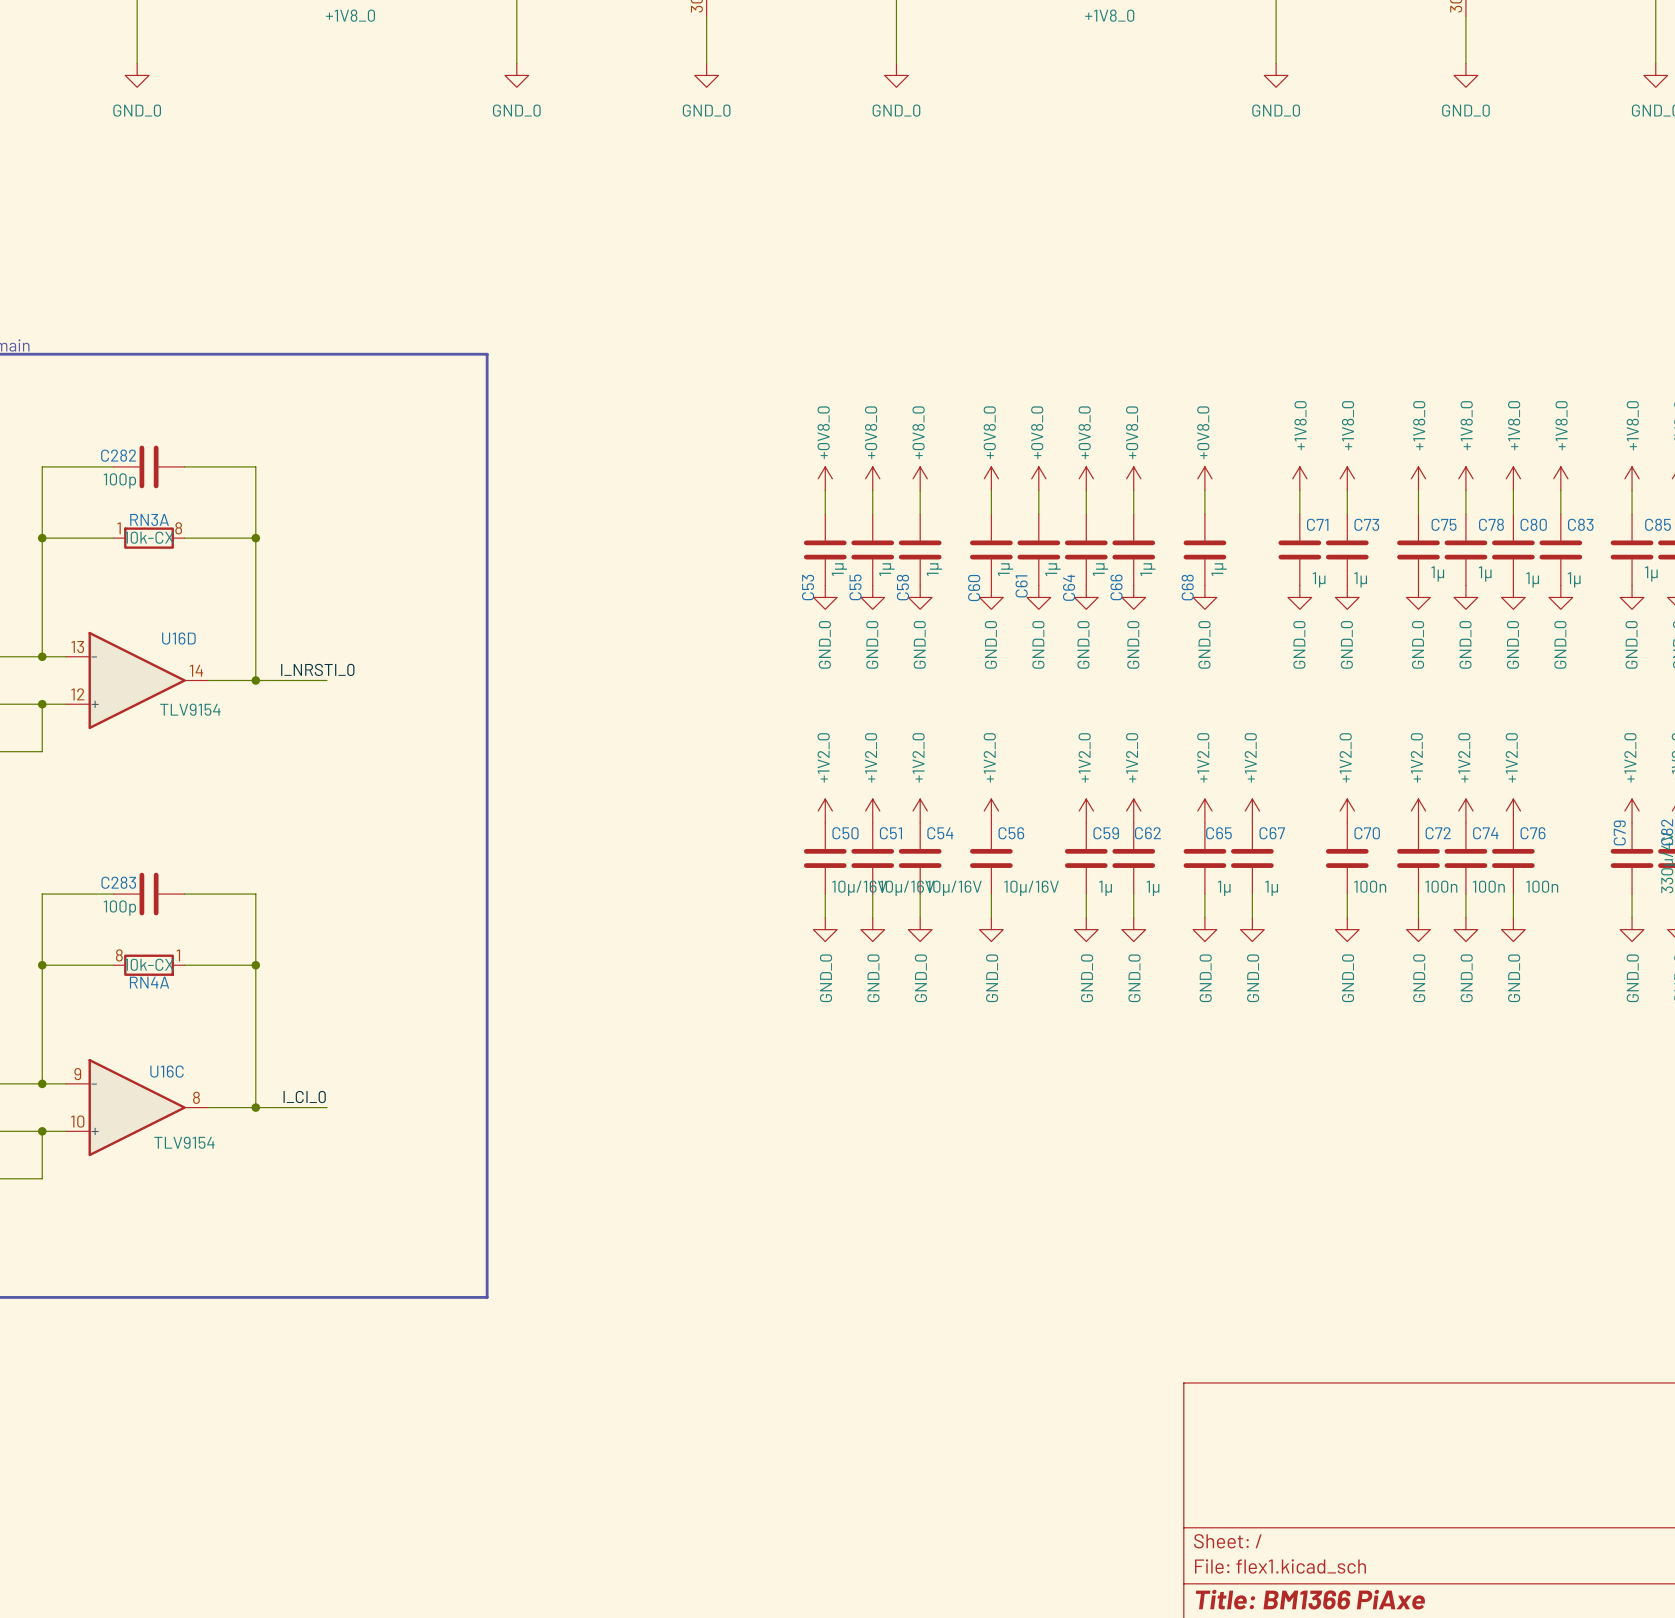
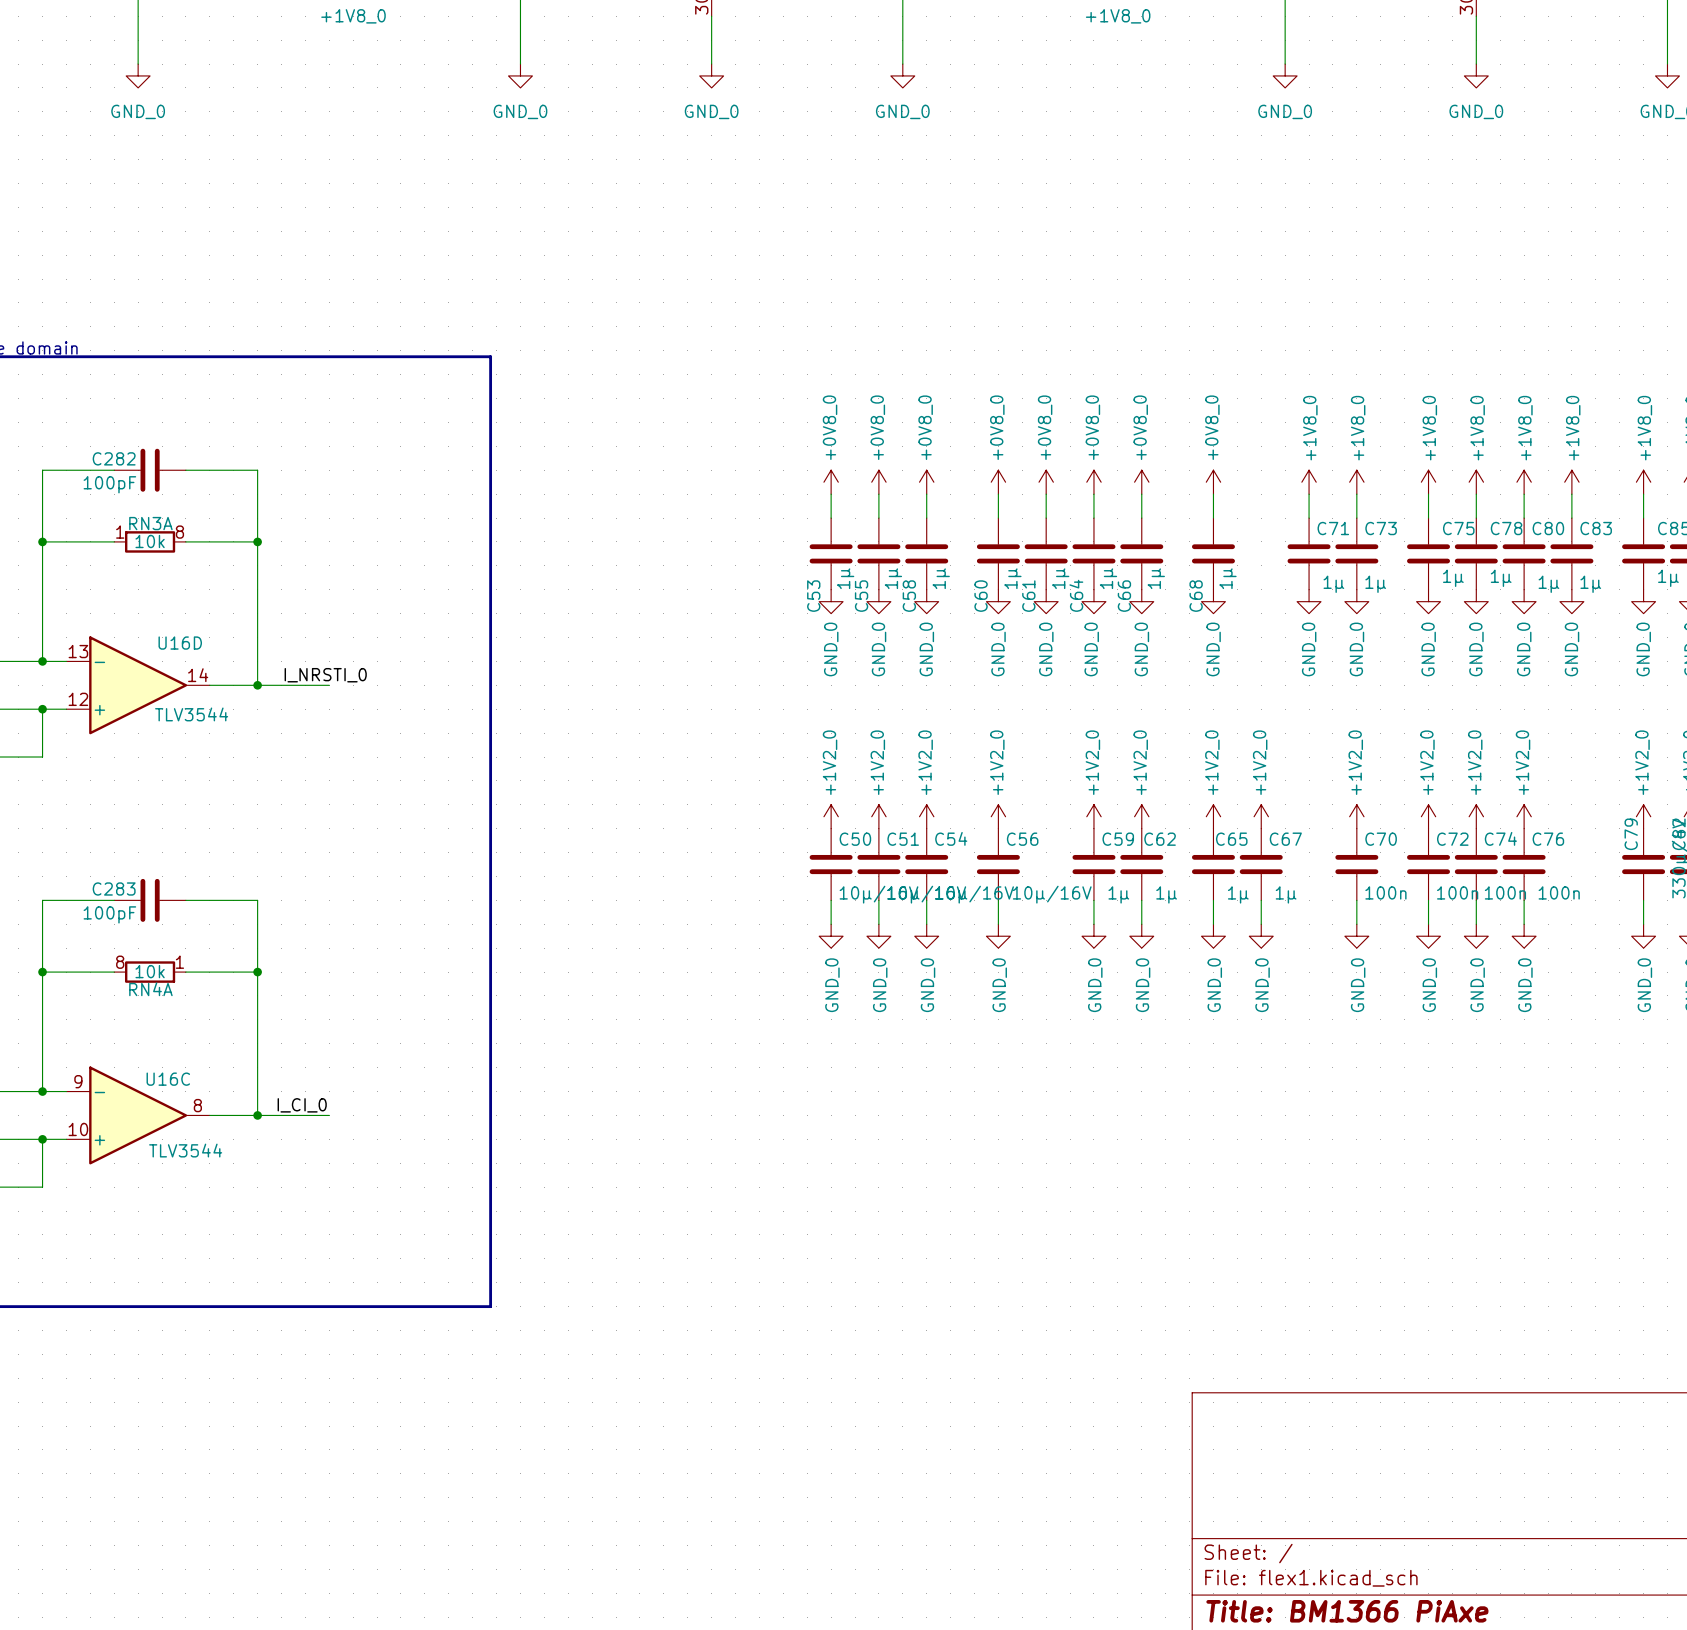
C282 value: 100p (119, 480) -> 100pF (109, 484)
RN3A value: 10k-CX (149, 537) -> 10k (150, 541)
U16D value: TLV9154 (190, 709) -> TLV3544 (191, 714)
C283 value: 100p (119, 908) -> 100pF (109, 914)
RN4A value: 10k-CX (149, 964) -> 10k (150, 971)
U16C value: TLV9154 (184, 1142) -> TLV3544 (185, 1150)

